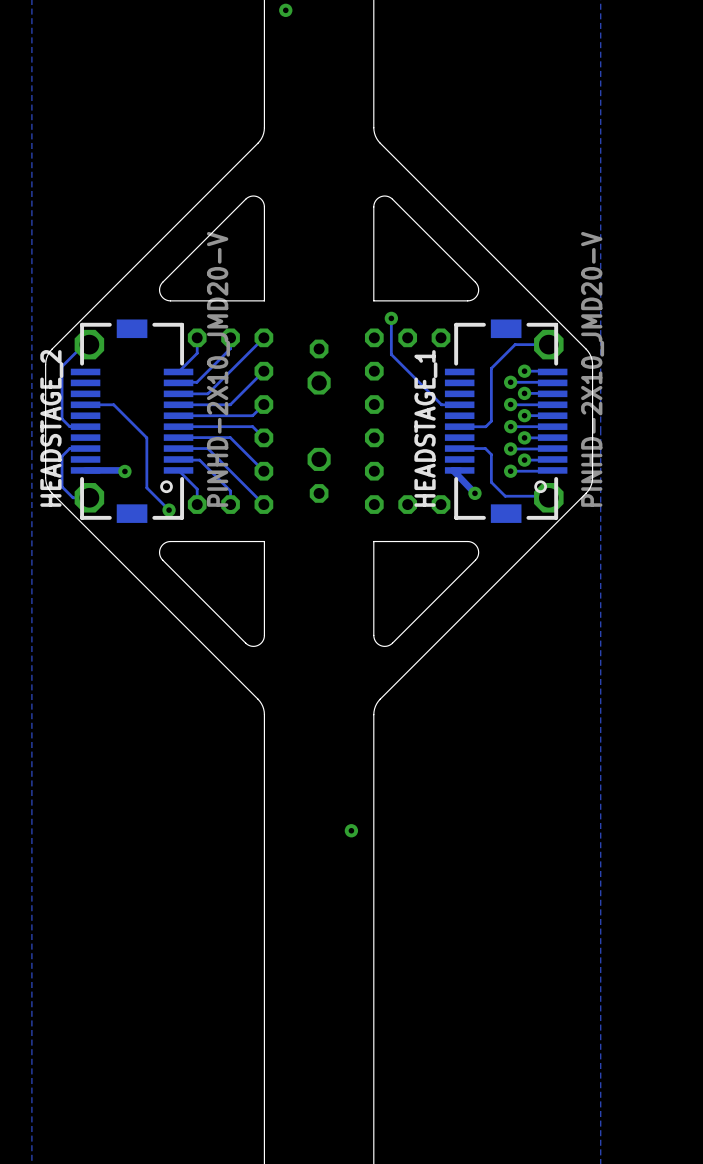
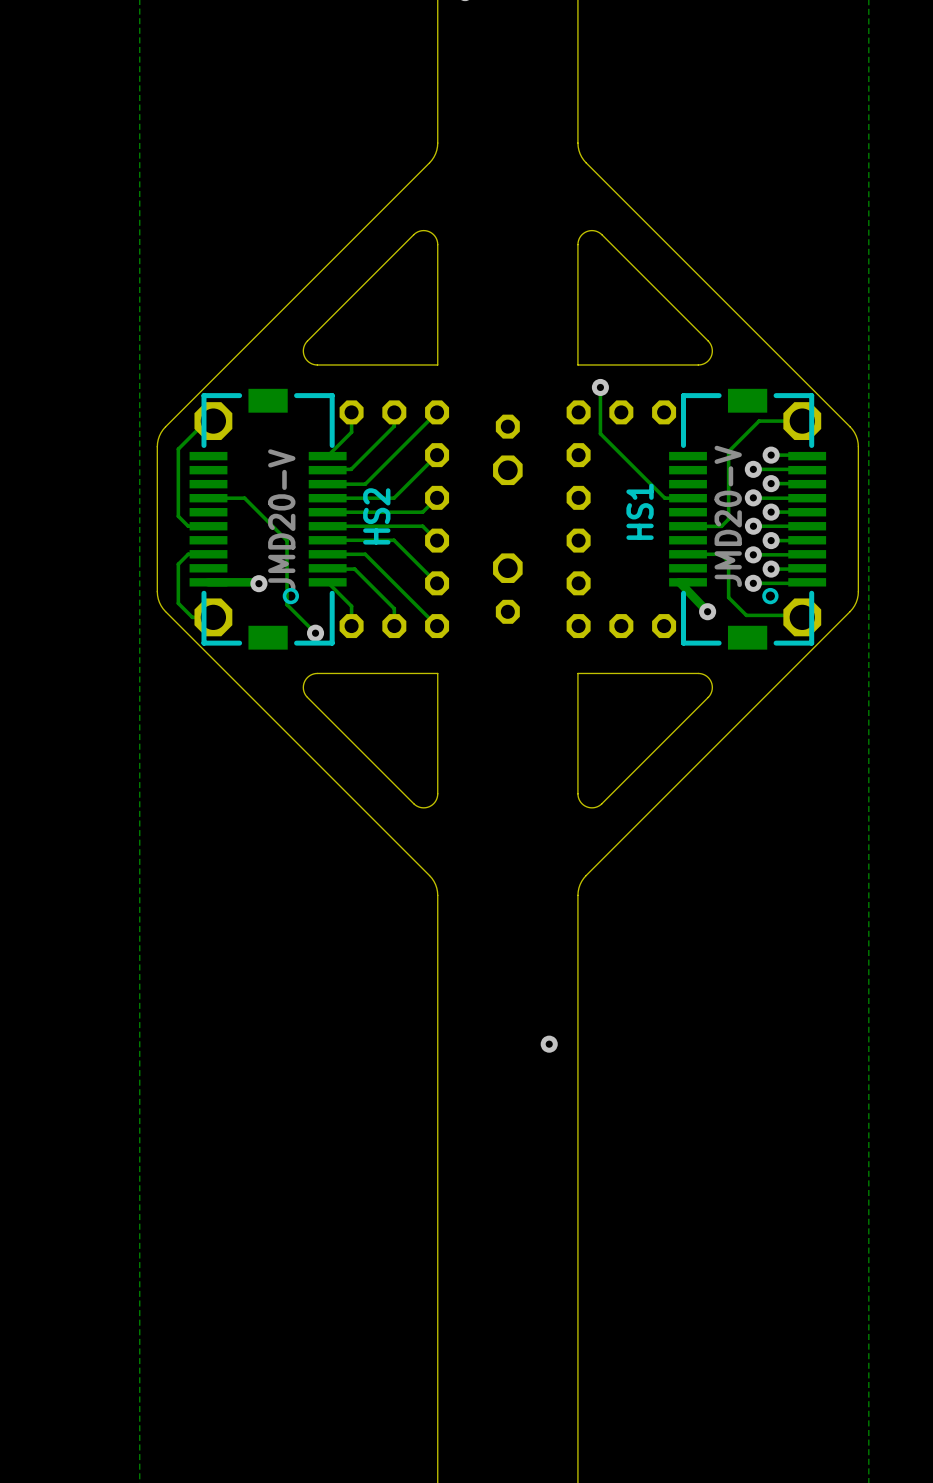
HEADSTAGE_2: PINHD-2X10_JMD20-V (132, 421) -> none
HS2: none -> JMD20-V (268, 519)
HEADSTAGE_1: PINHD-2X10_JMD20-V (506, 421) -> none
HS1: none -> JMD20-V (747, 519)

